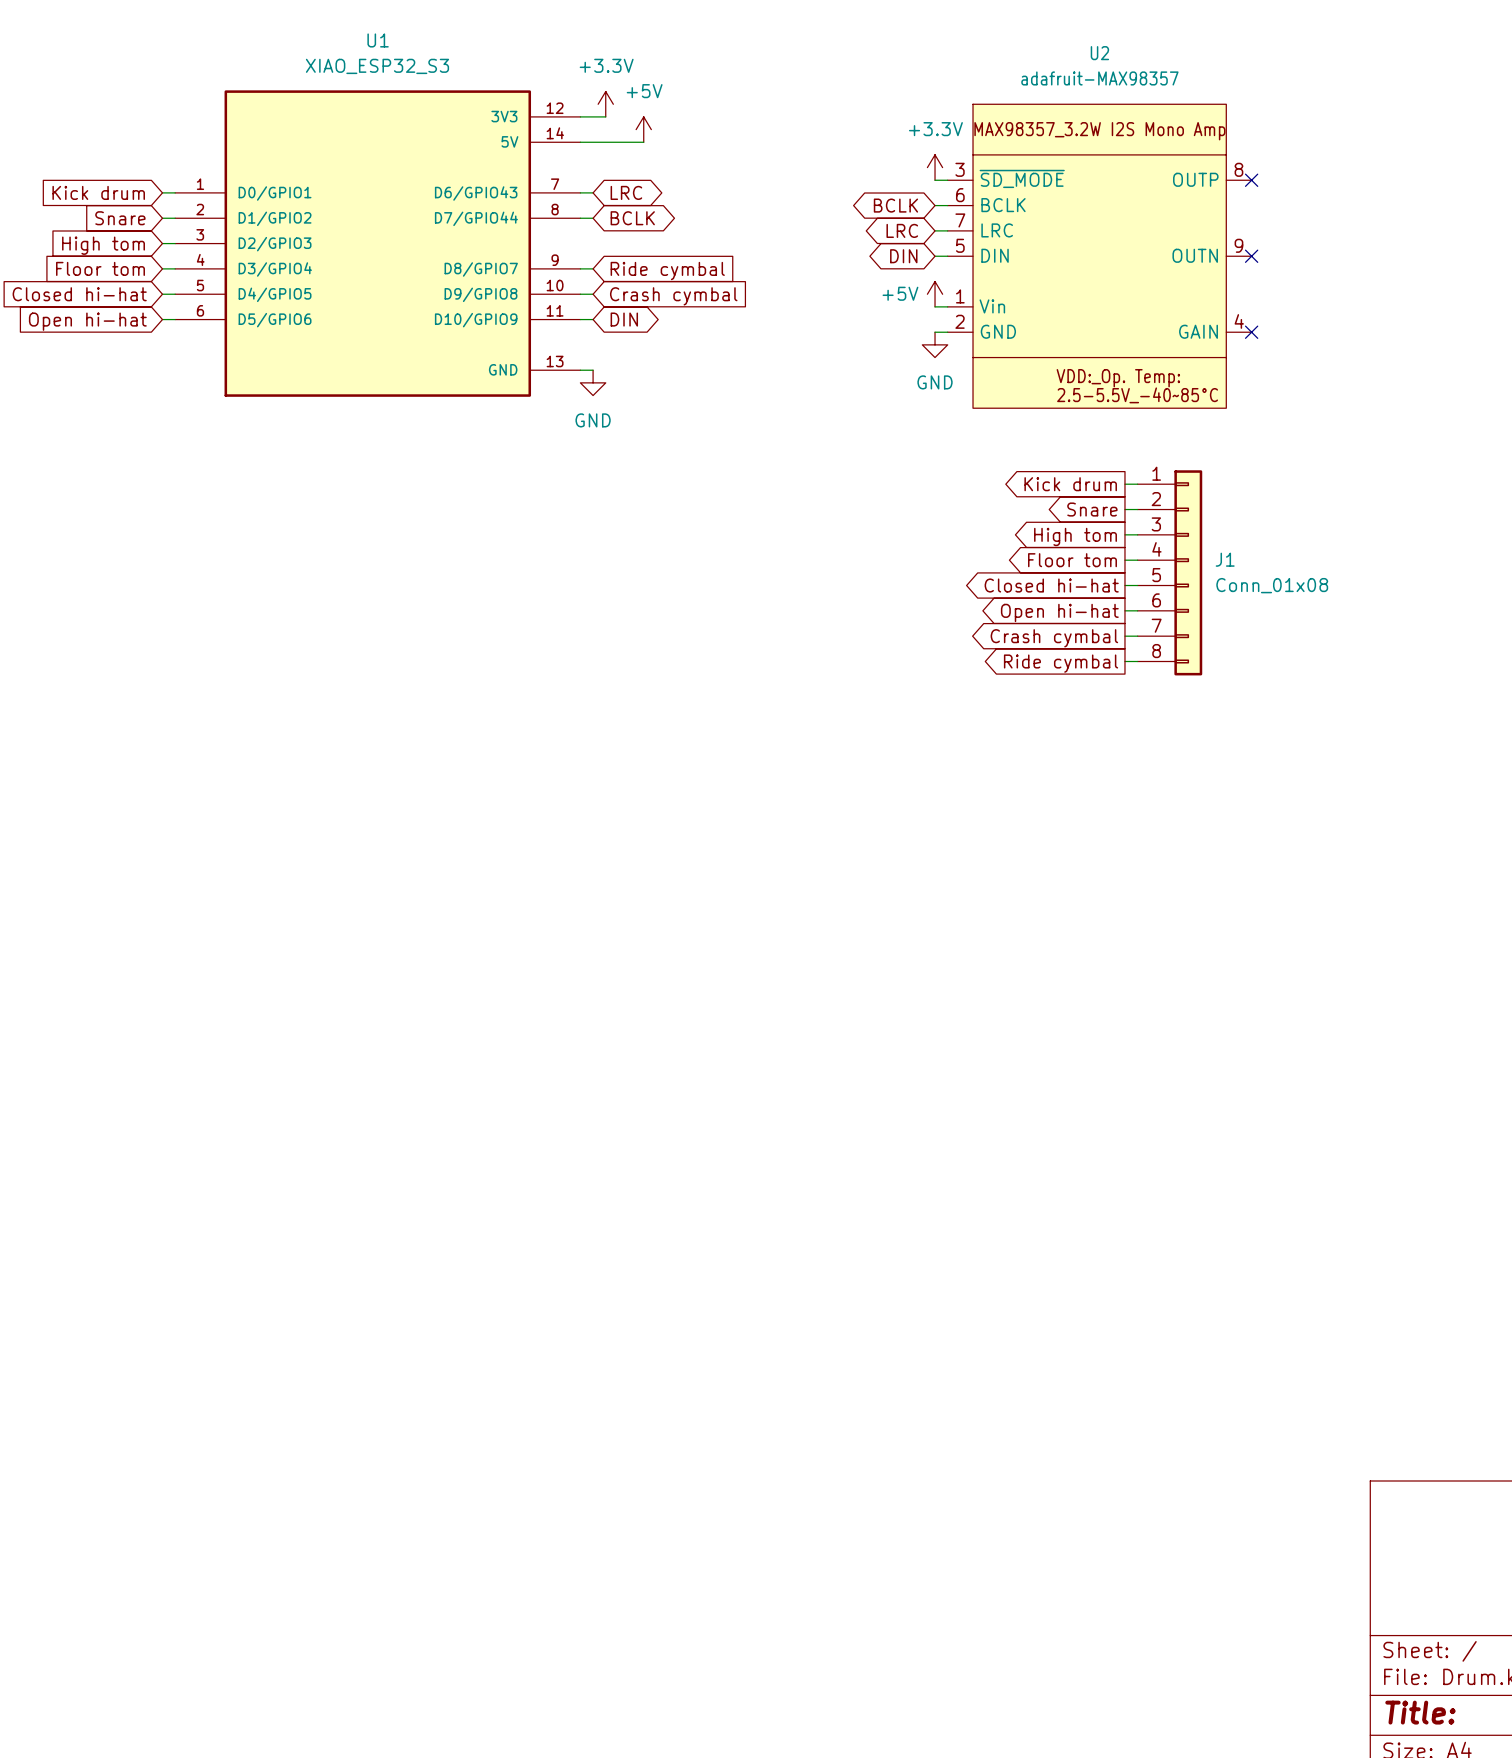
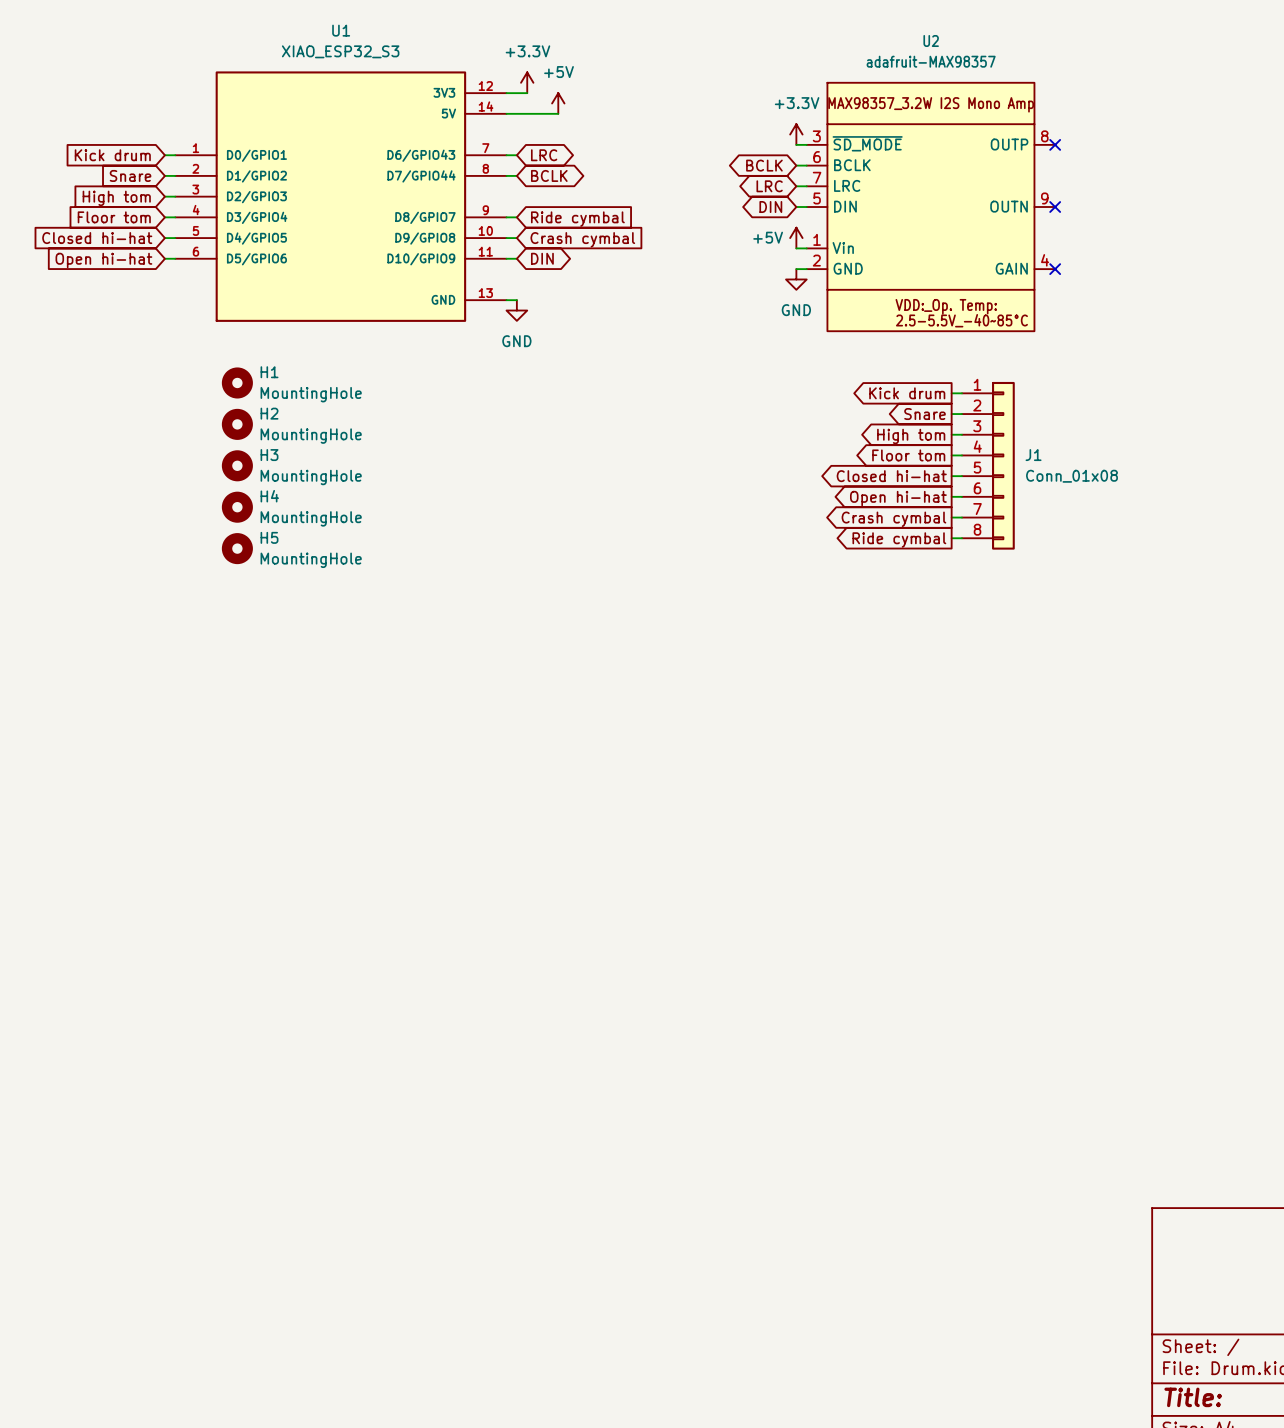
H1: none -> MountingHole (237, 382)
H2: none -> MountingHole (237, 424)
H3: none -> MountingHole (237, 465)
H4: none -> MountingHole (237, 507)
H5: none -> MountingHole (237, 548)

